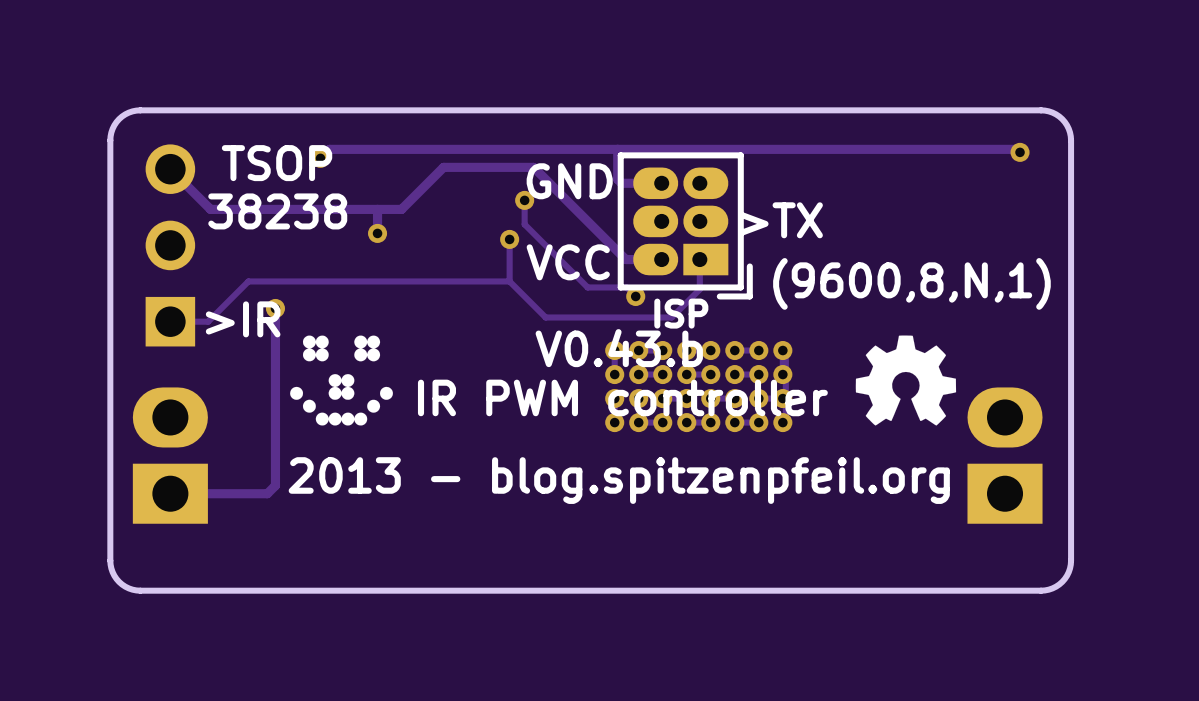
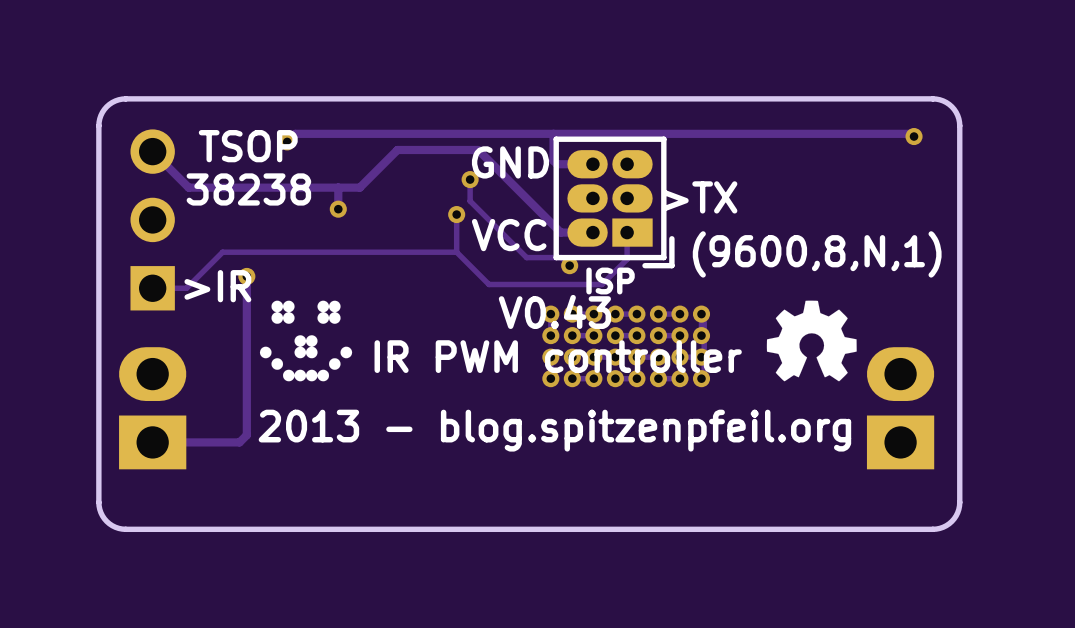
text: V0.43.b (619, 348) -> V0.43 (554, 311)

